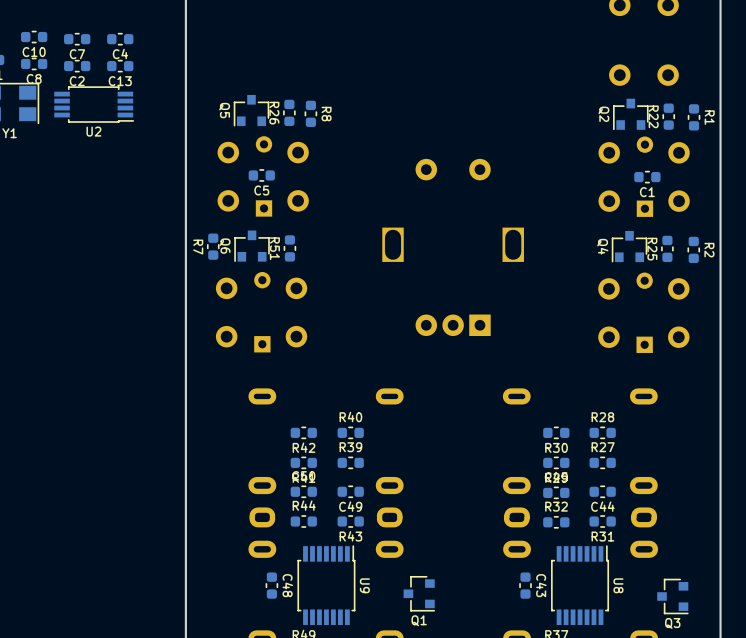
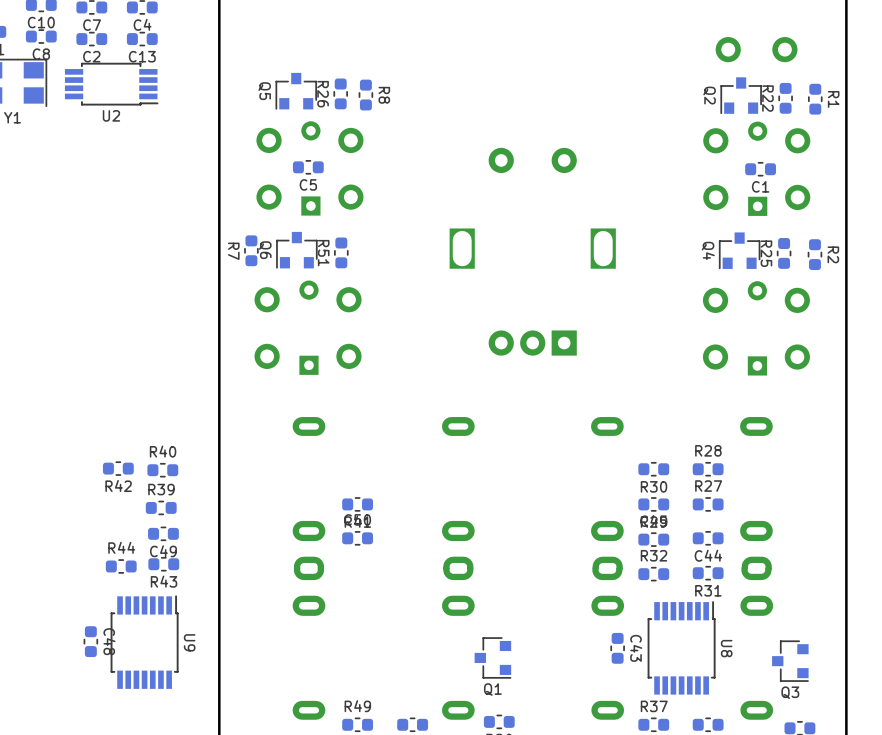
R42 position: (303, 432) -> (118, 468)
R40 position: (350, 432) -> (162, 470)
R39 position: (350, 462) -> (161, 507)
C49 position: (350, 491) -> (163, 533)
R44 position: (303, 521) -> (121, 566)
R43 position: (350, 521) -> (163, 564)
C48 position: (271, 585) -> (90, 641)
U9 position: (326, 585) -> (144, 642)

